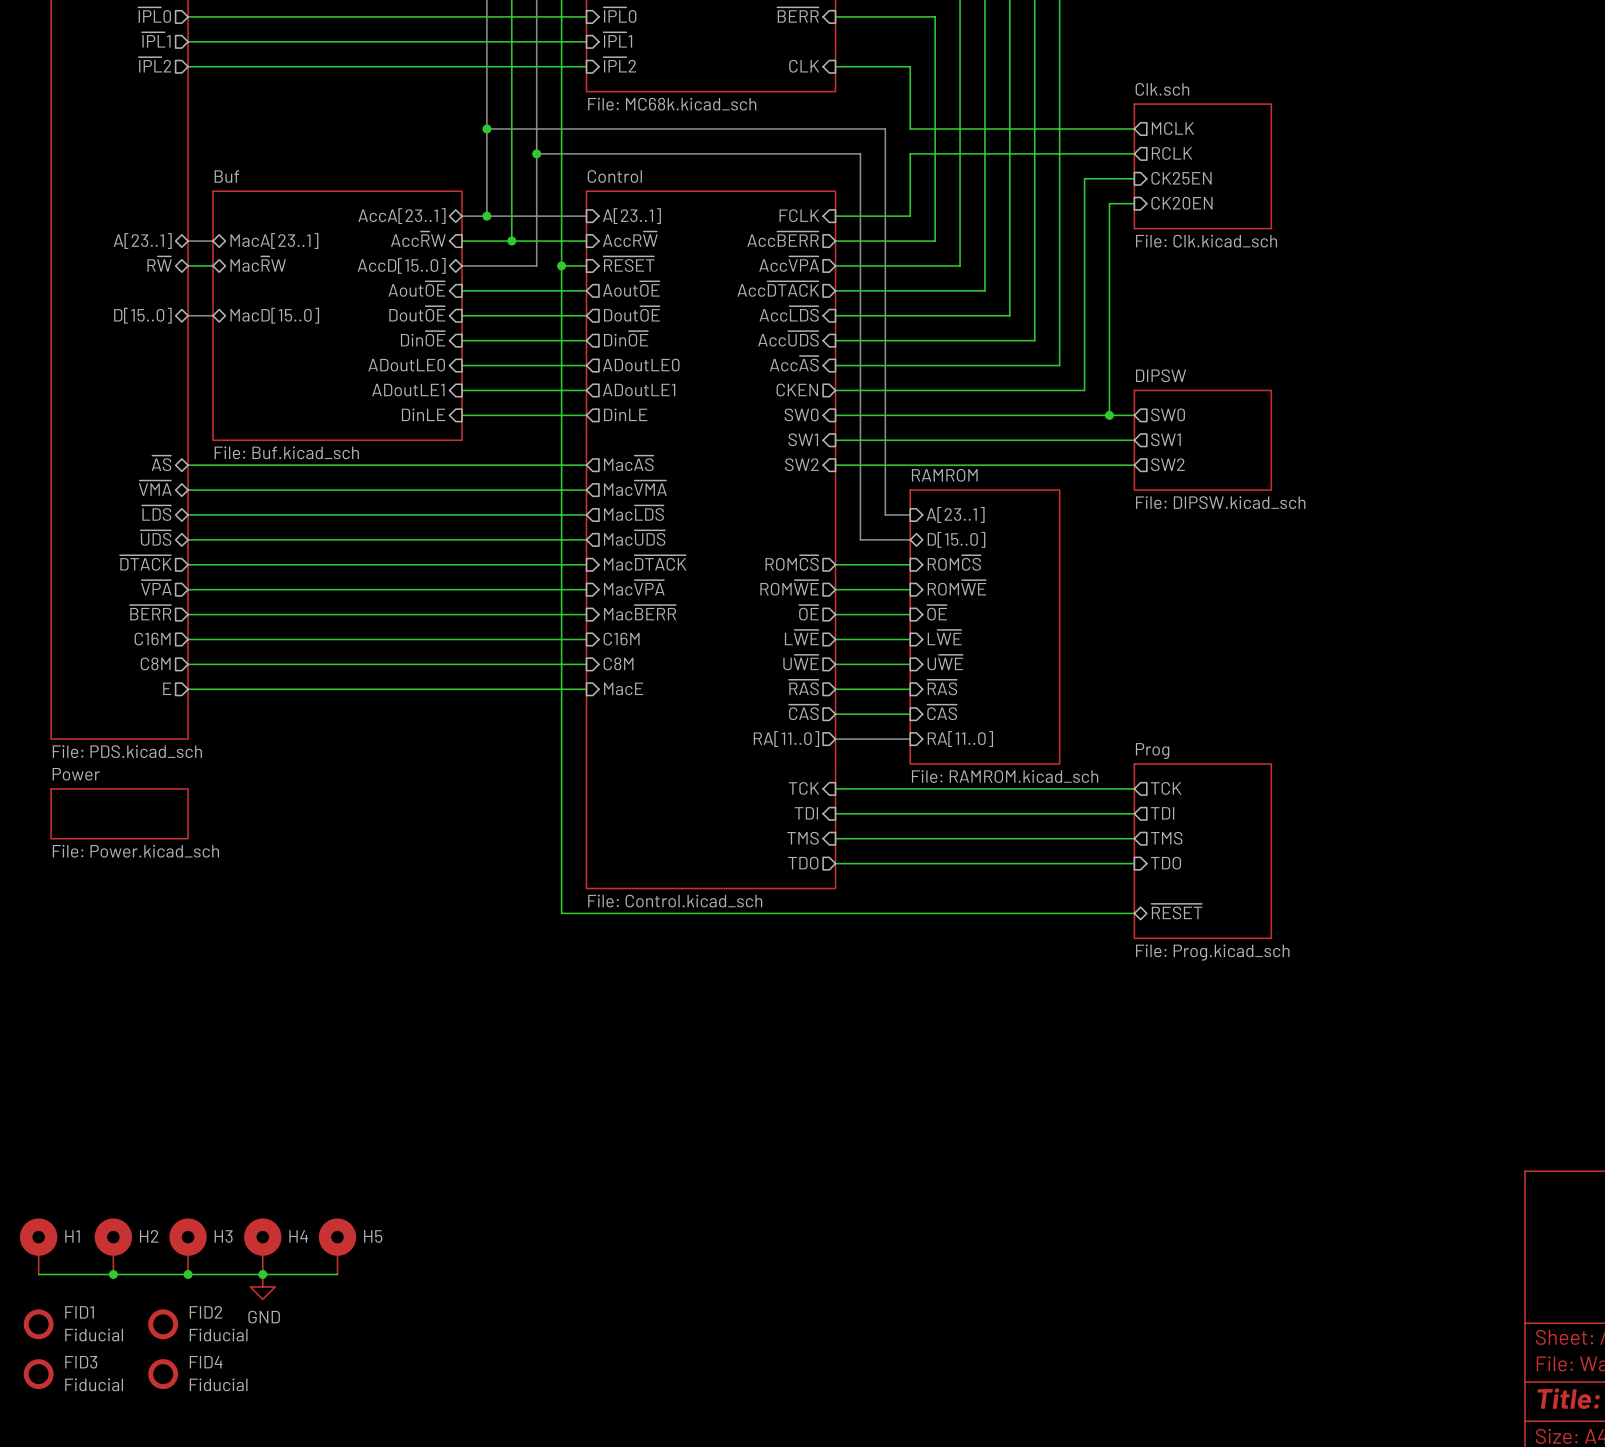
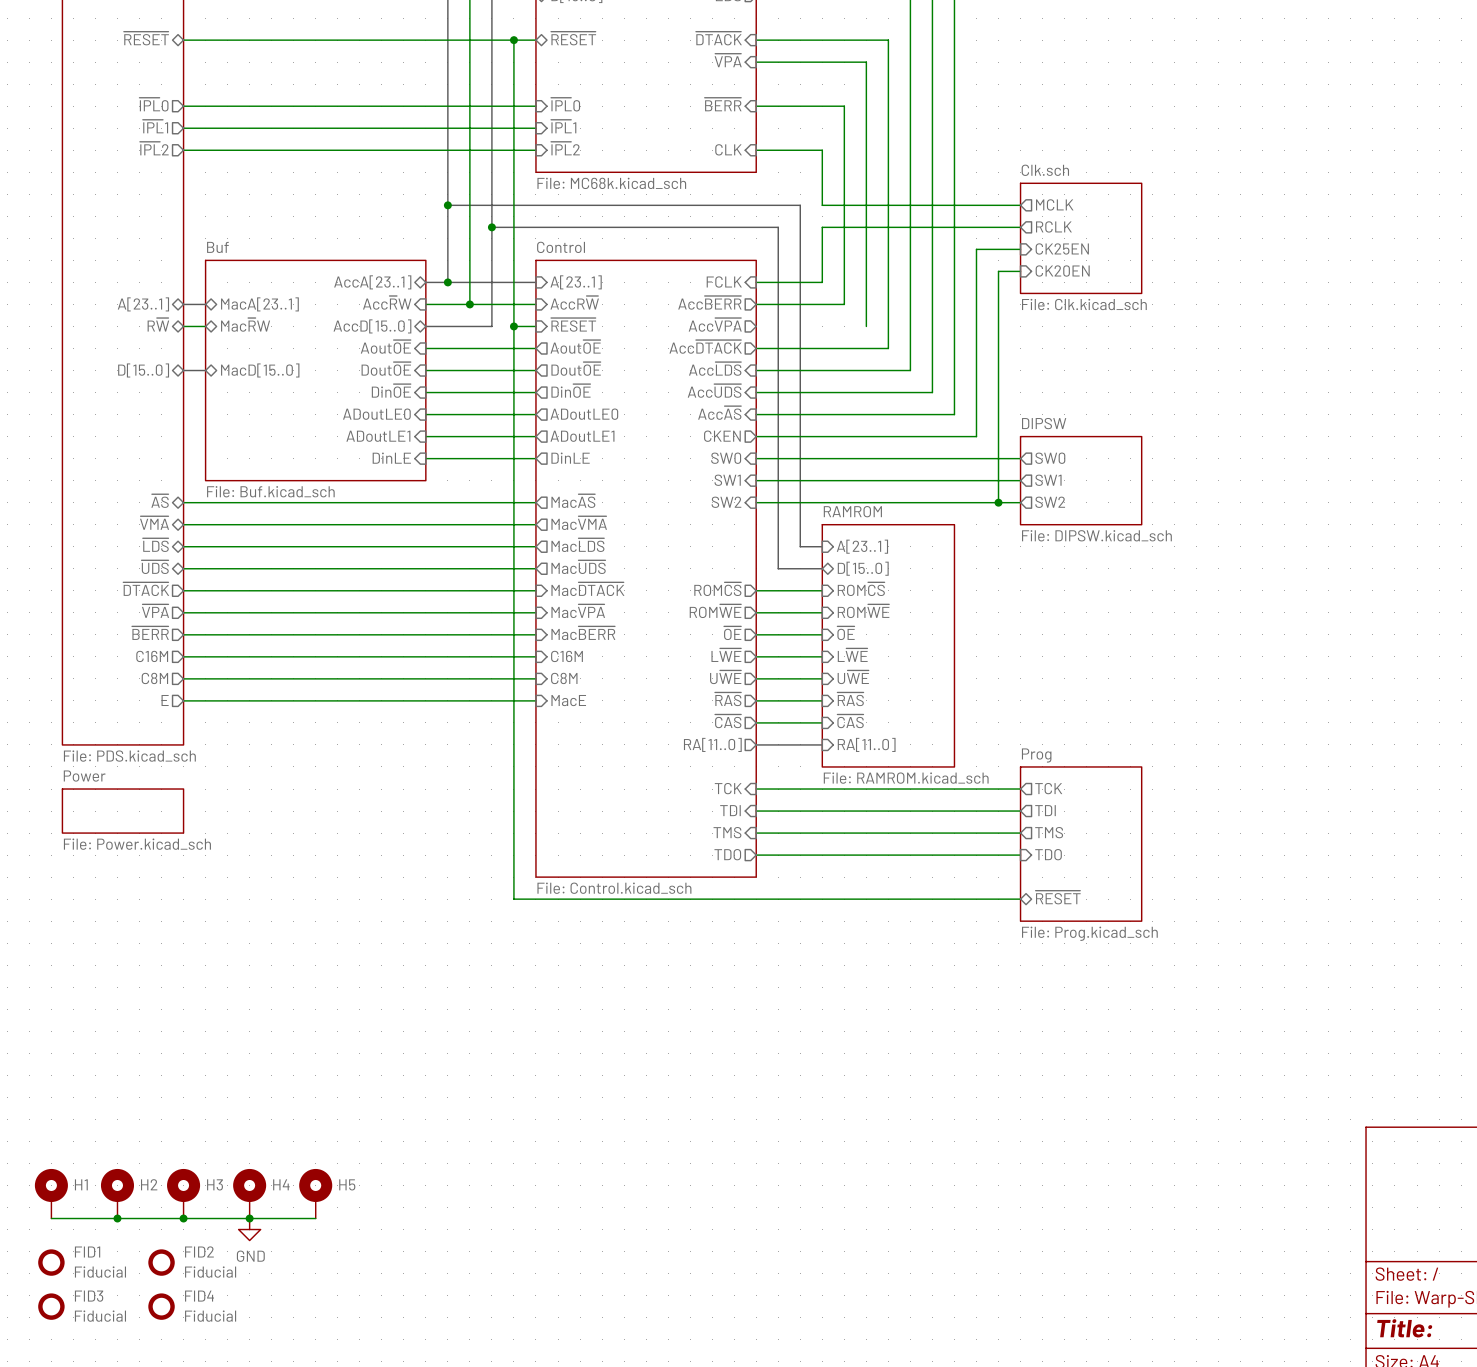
wire: (835, 265) (960, 265) -> none
wire: none -> (998, 458) (998, 502)
junction position: (1109, 415) -> (998, 502)

